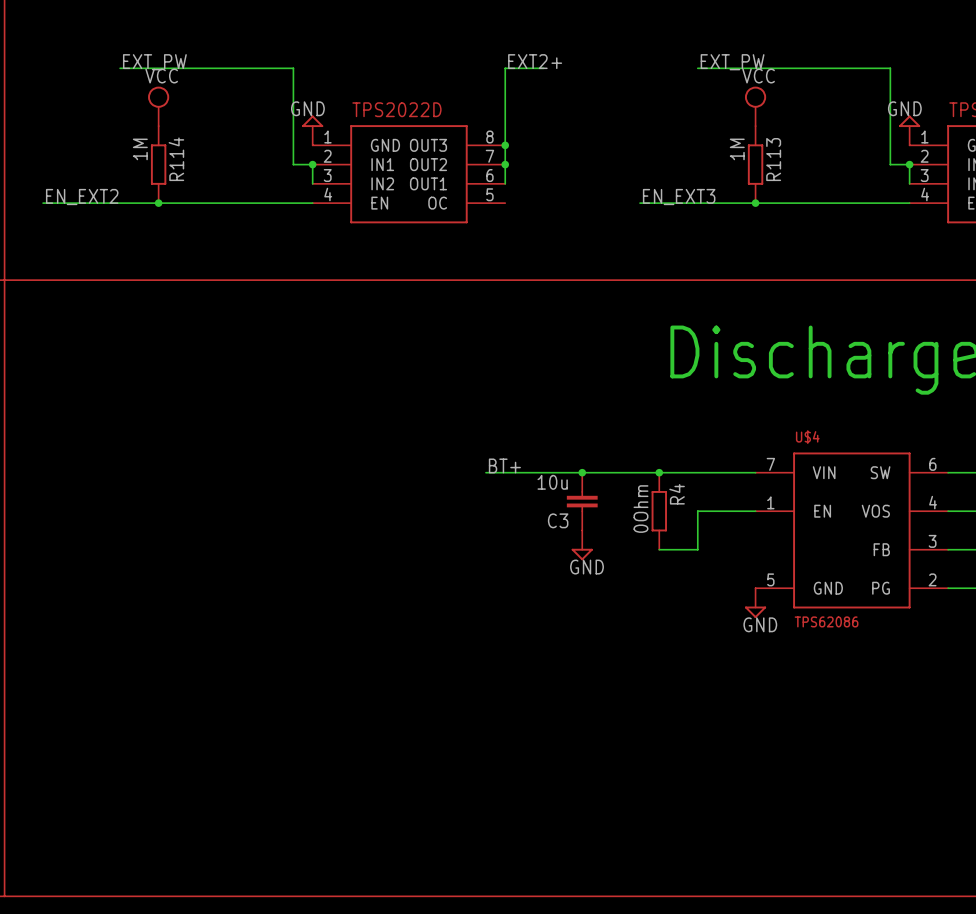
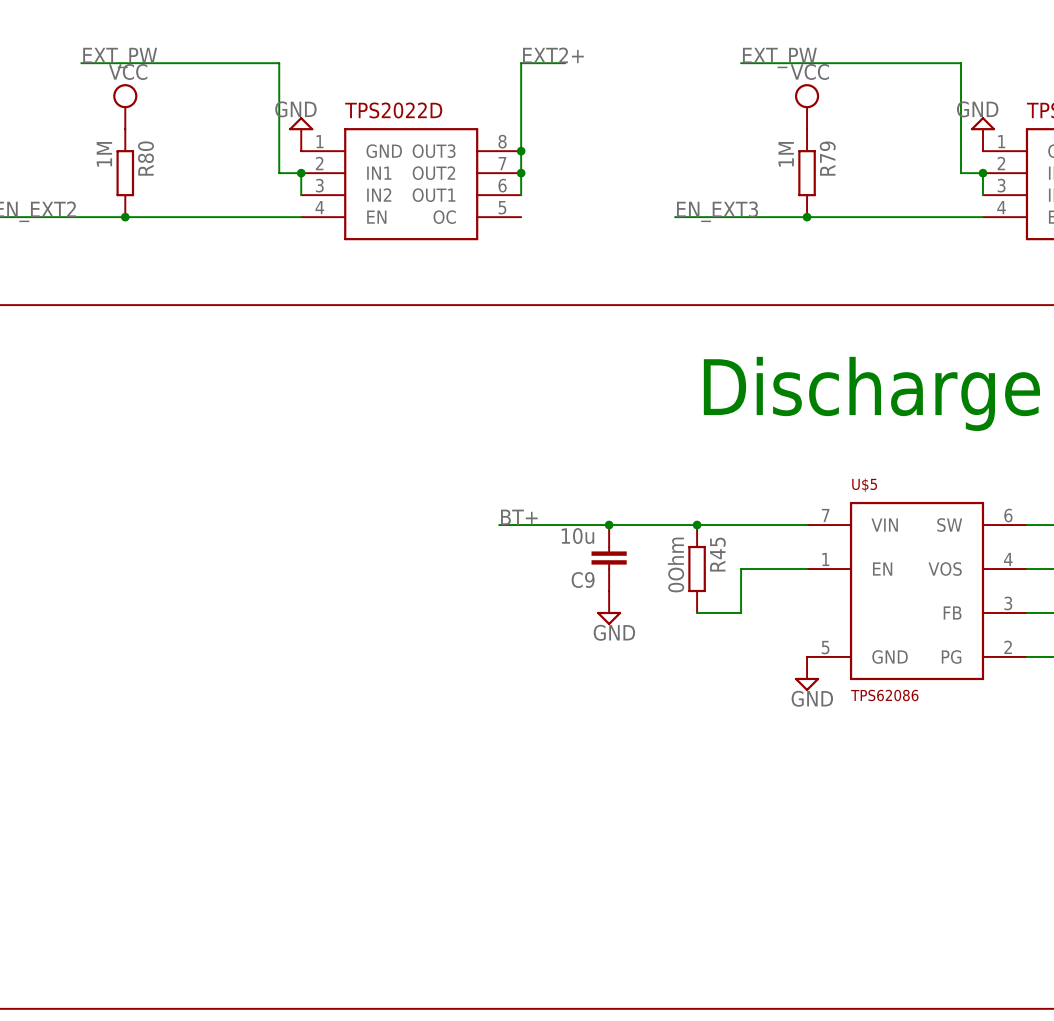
R114 name: R114 (176, 159) -> R80 (145, 158)
R113 name: R113 (773, 159) -> R79 (827, 158)
U$4 name: U$4 (807, 437) -> U$5 (864, 485)
R4 name: R4 (677, 494) -> R45 (717, 554)
C3 name: C3 (558, 520) -> C9 (583, 580)

